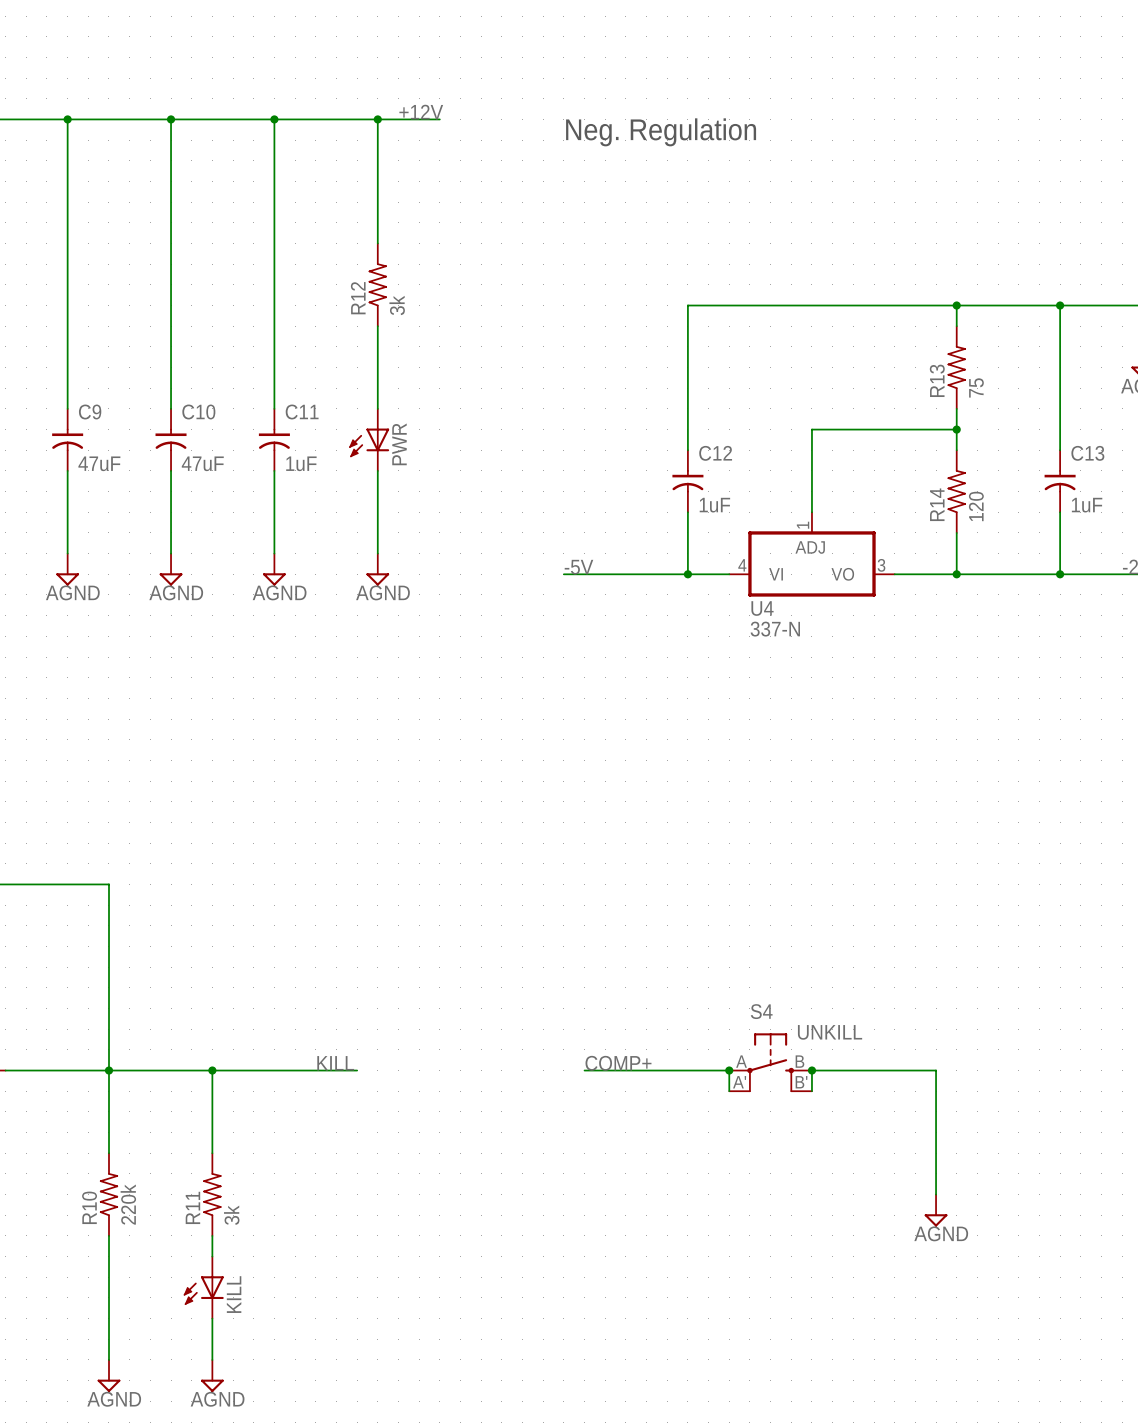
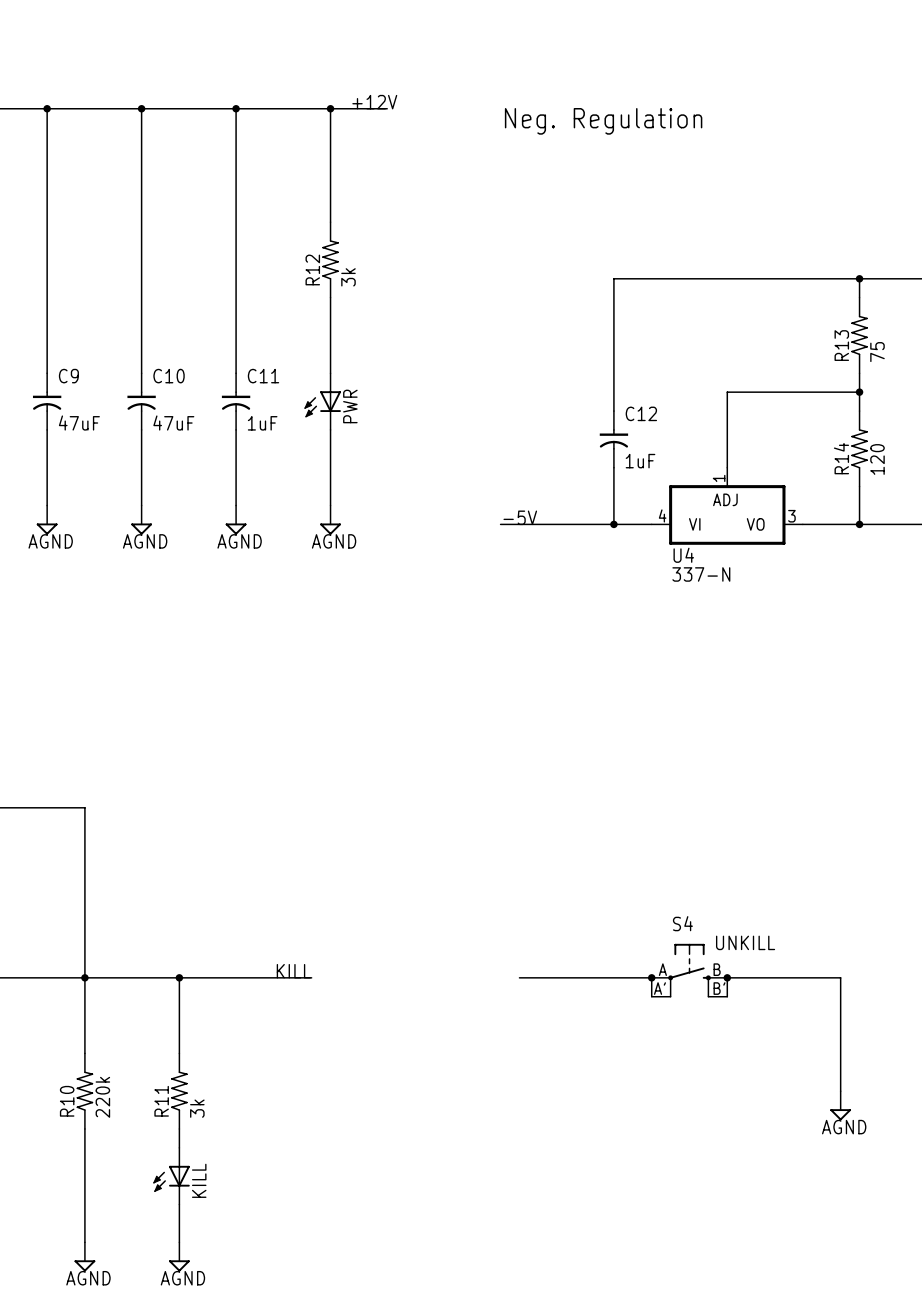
label: COMP+ (618, 1063) -> none

